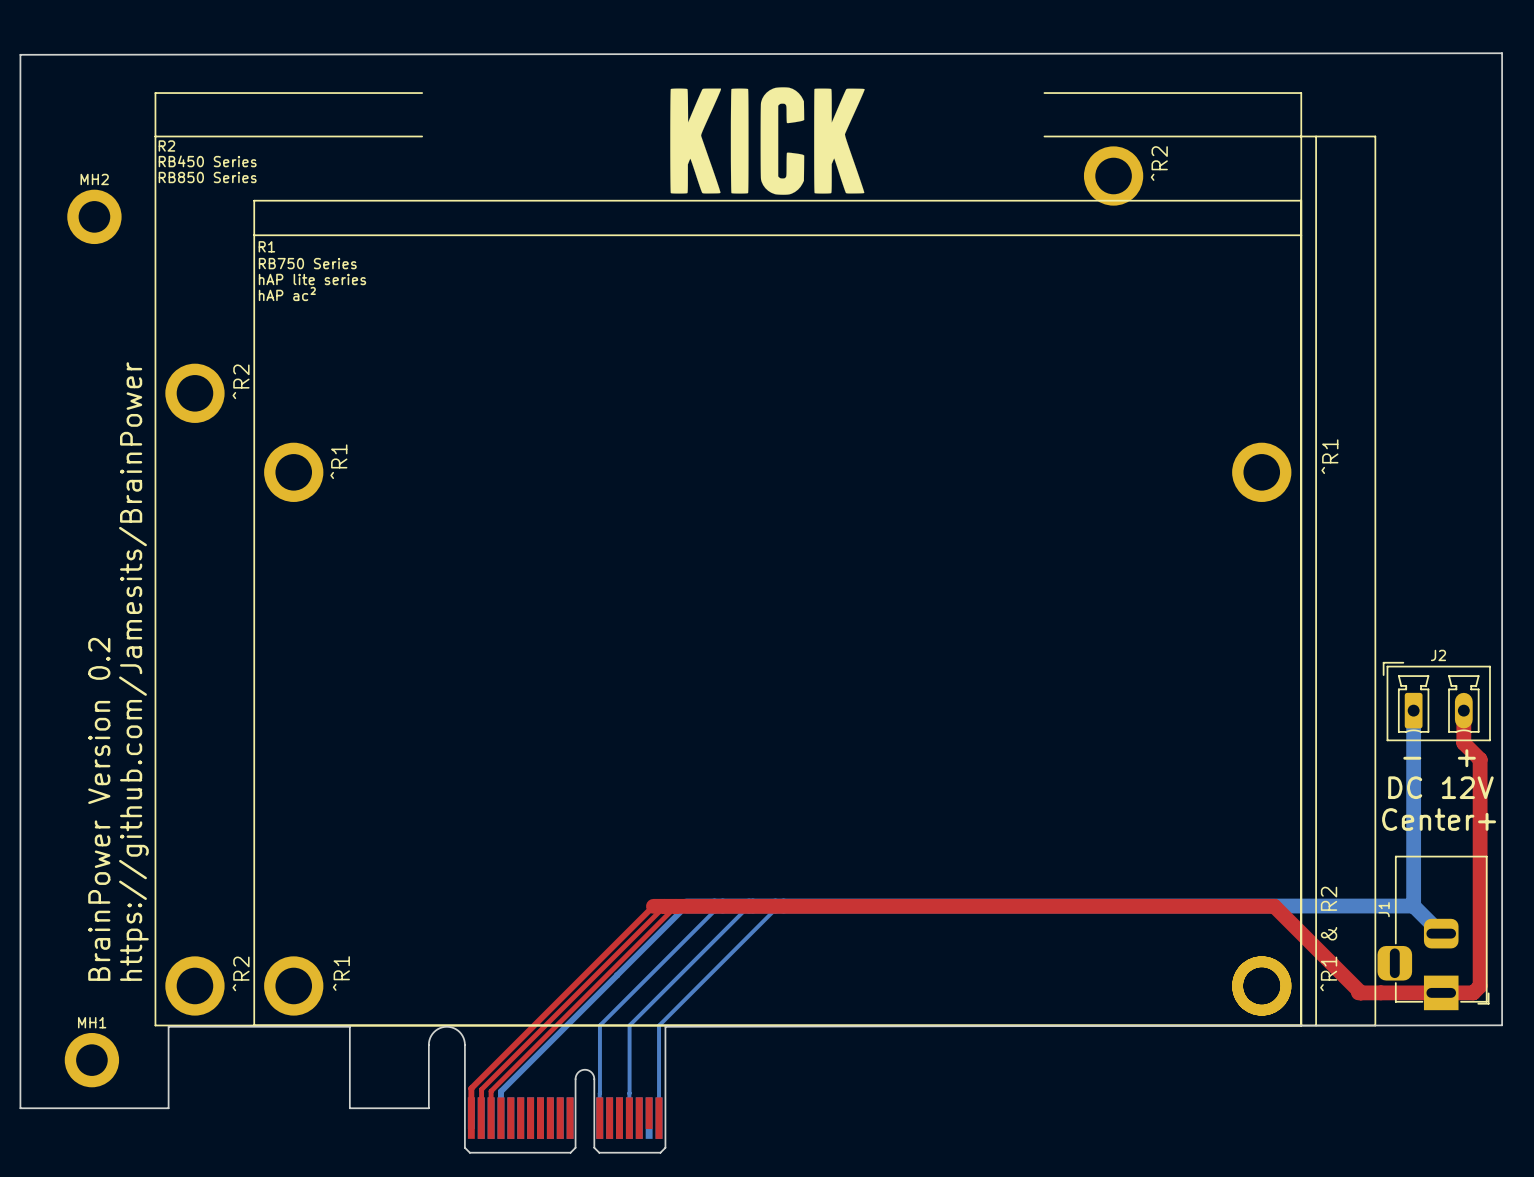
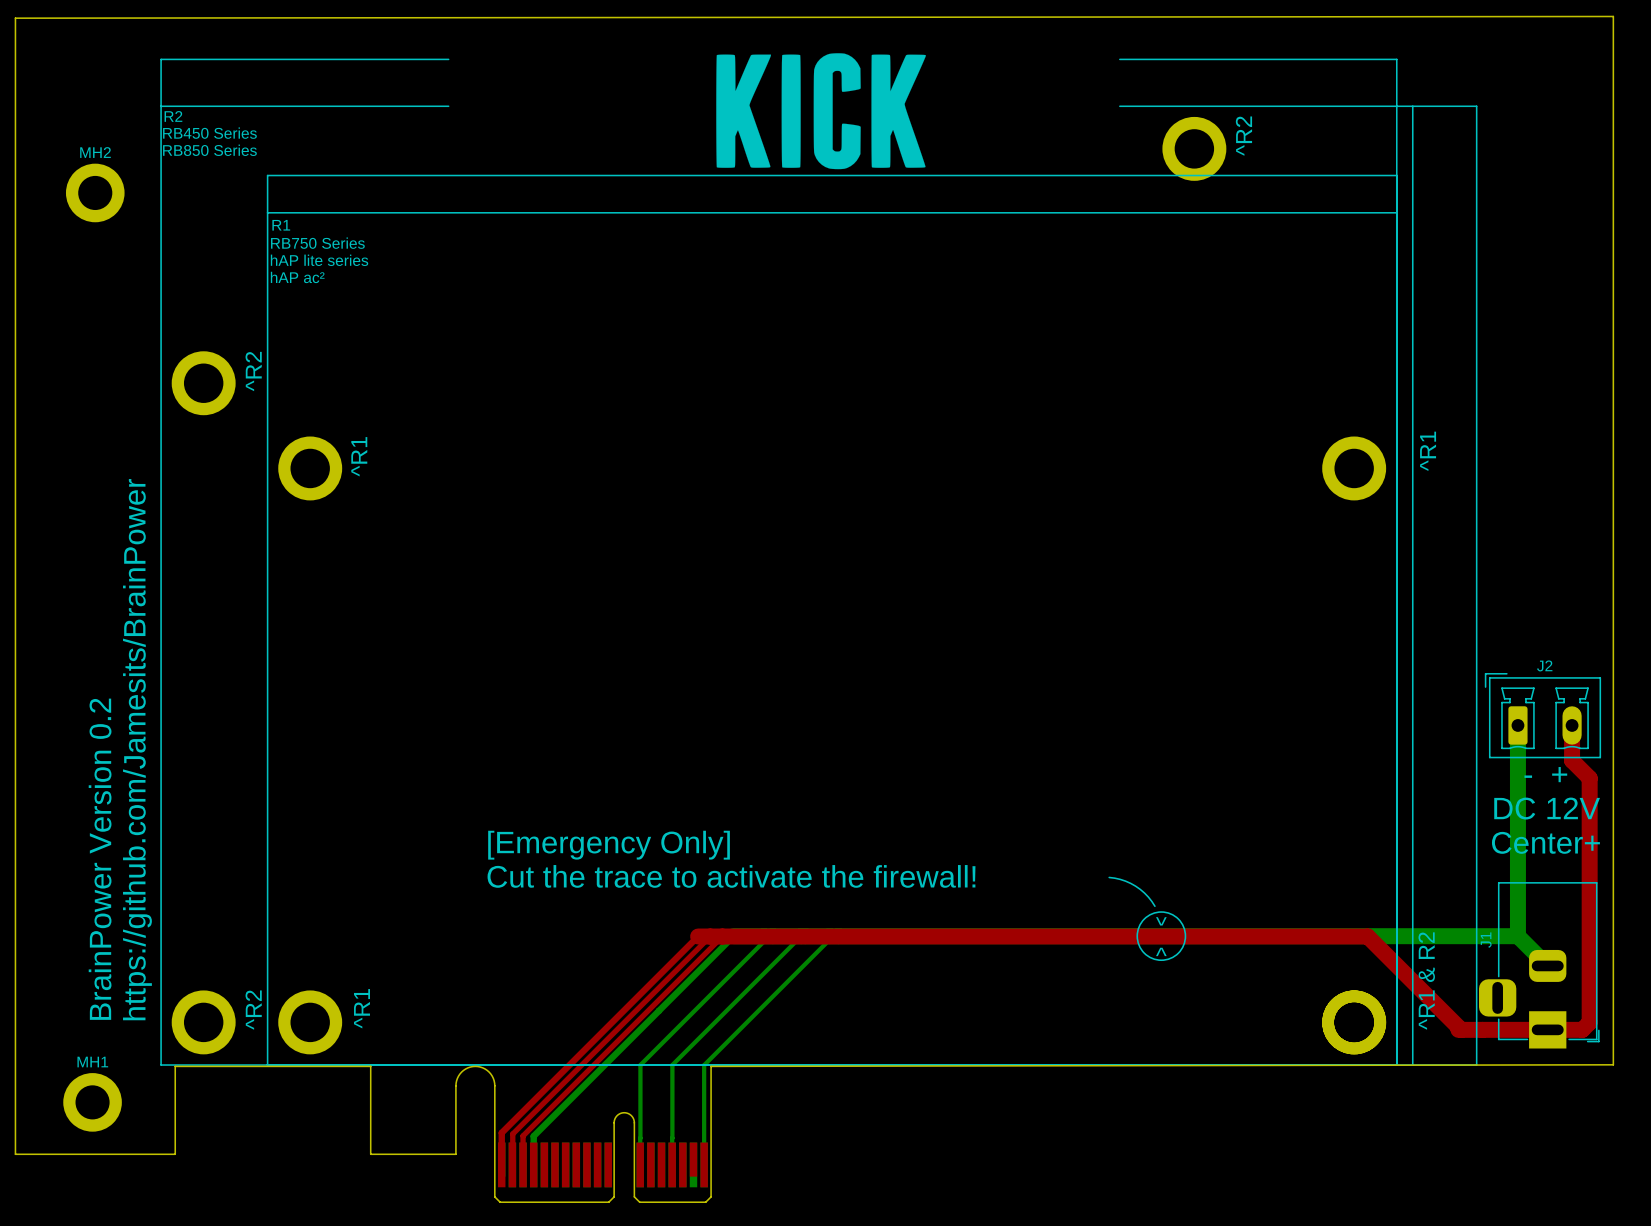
text: none -> [Emergency Only] (609, 845)
text: none -> Cut the trace to activate the firewall! (731, 876)
line: none -> (1109, 877) (1125, 881) (1135, 886) (1148, 897) (1154, 906)
drawing: none -> [1136, 911, 1187, 962]
text: none -> ^ (1161, 921)
text: none -> ^ (1161, 951)

